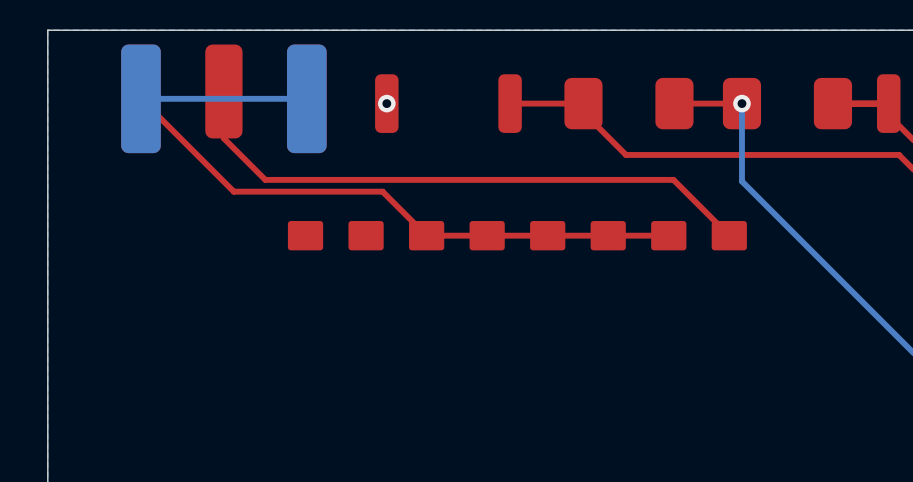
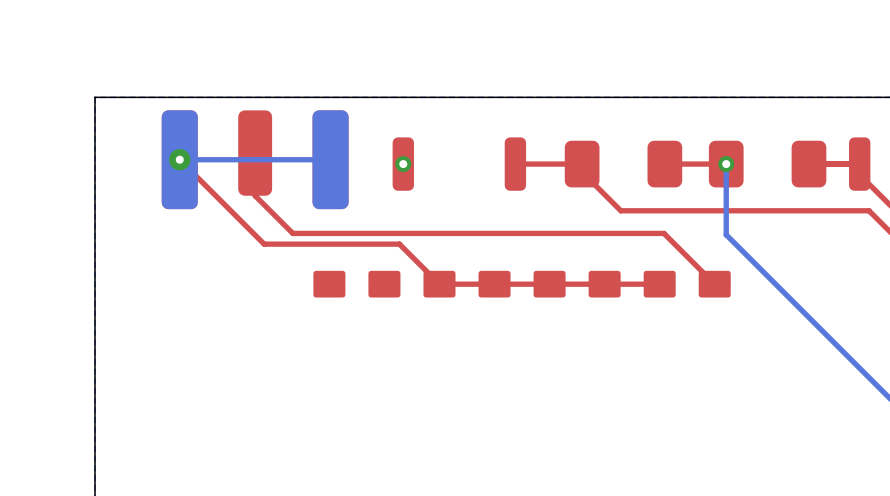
via: none -> (179, 159)

